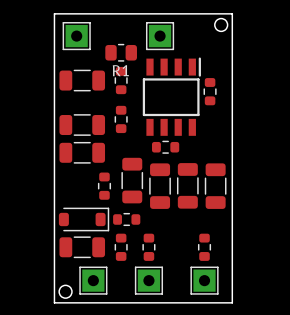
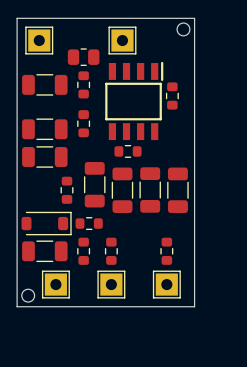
R1 name: R1 (120, 70) -> none

